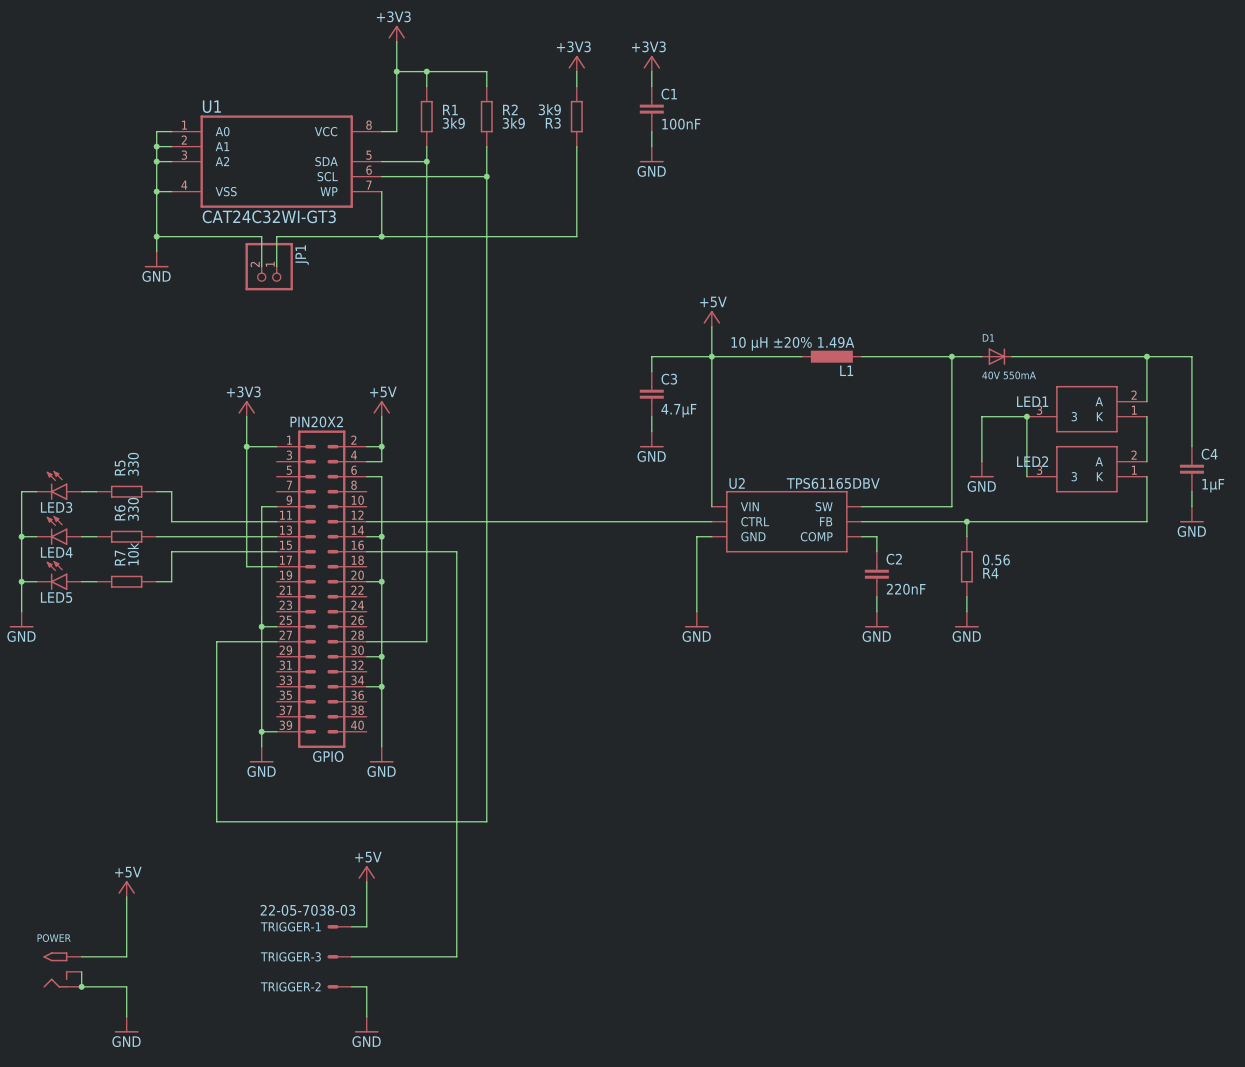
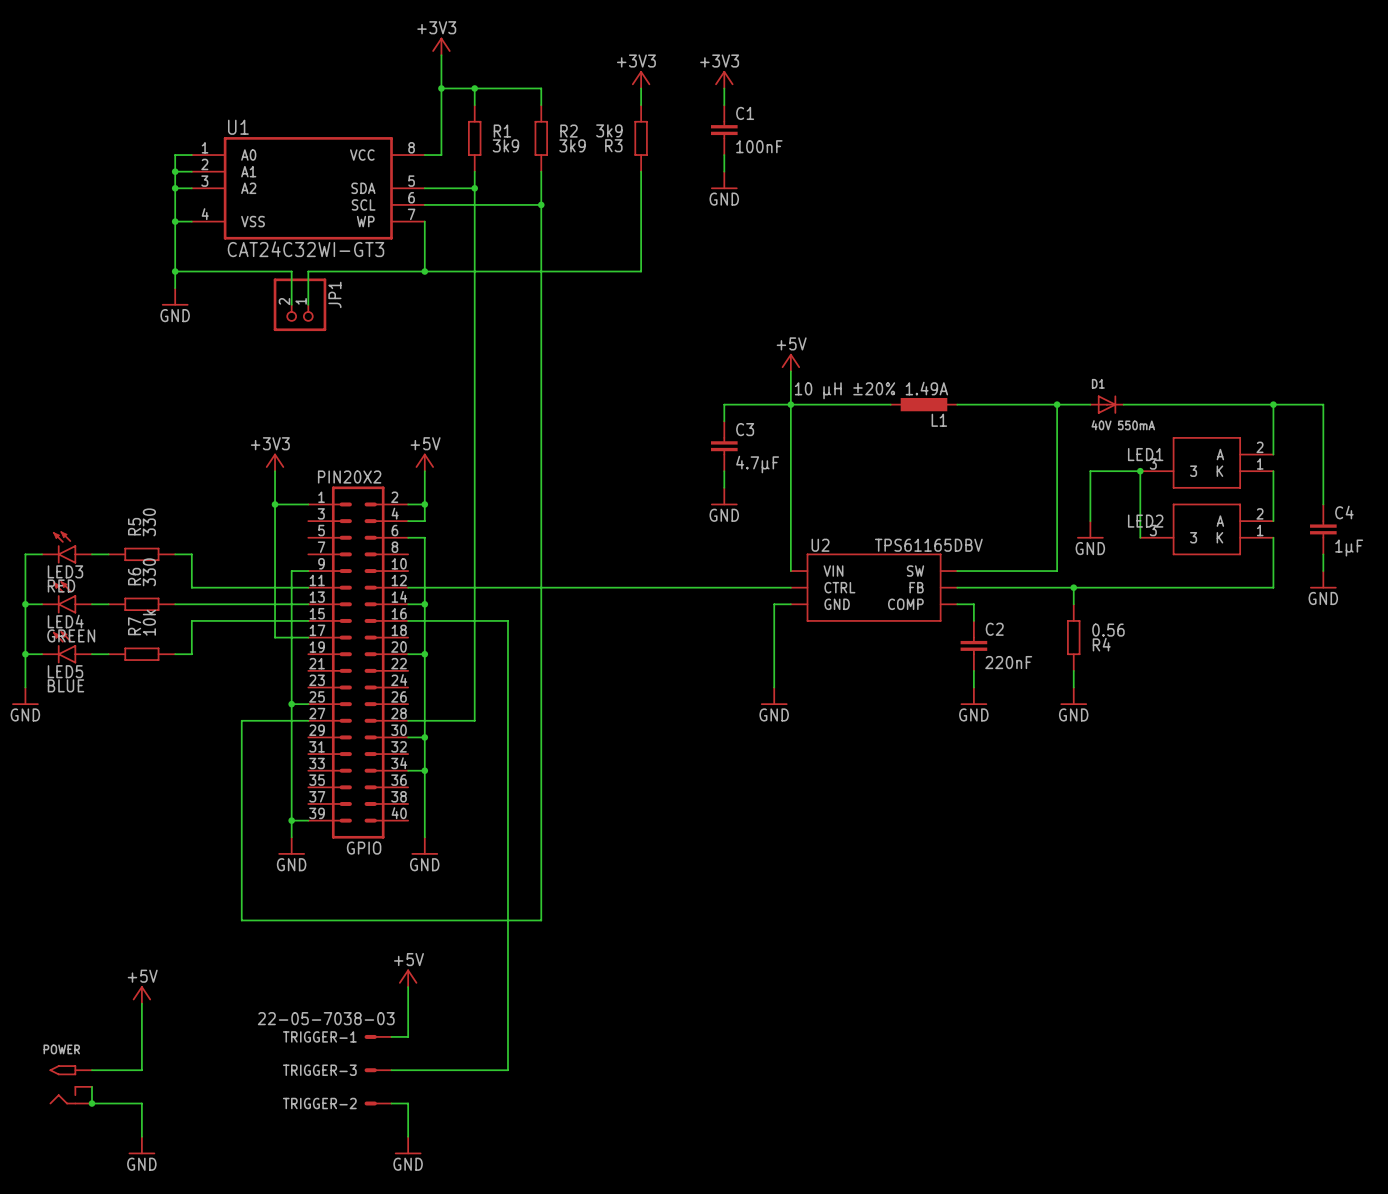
LED3 value: none -> RED (61, 586)
LED4 value: none -> GREEN (71, 635)
LED5 value: none -> BLUE (65, 685)

